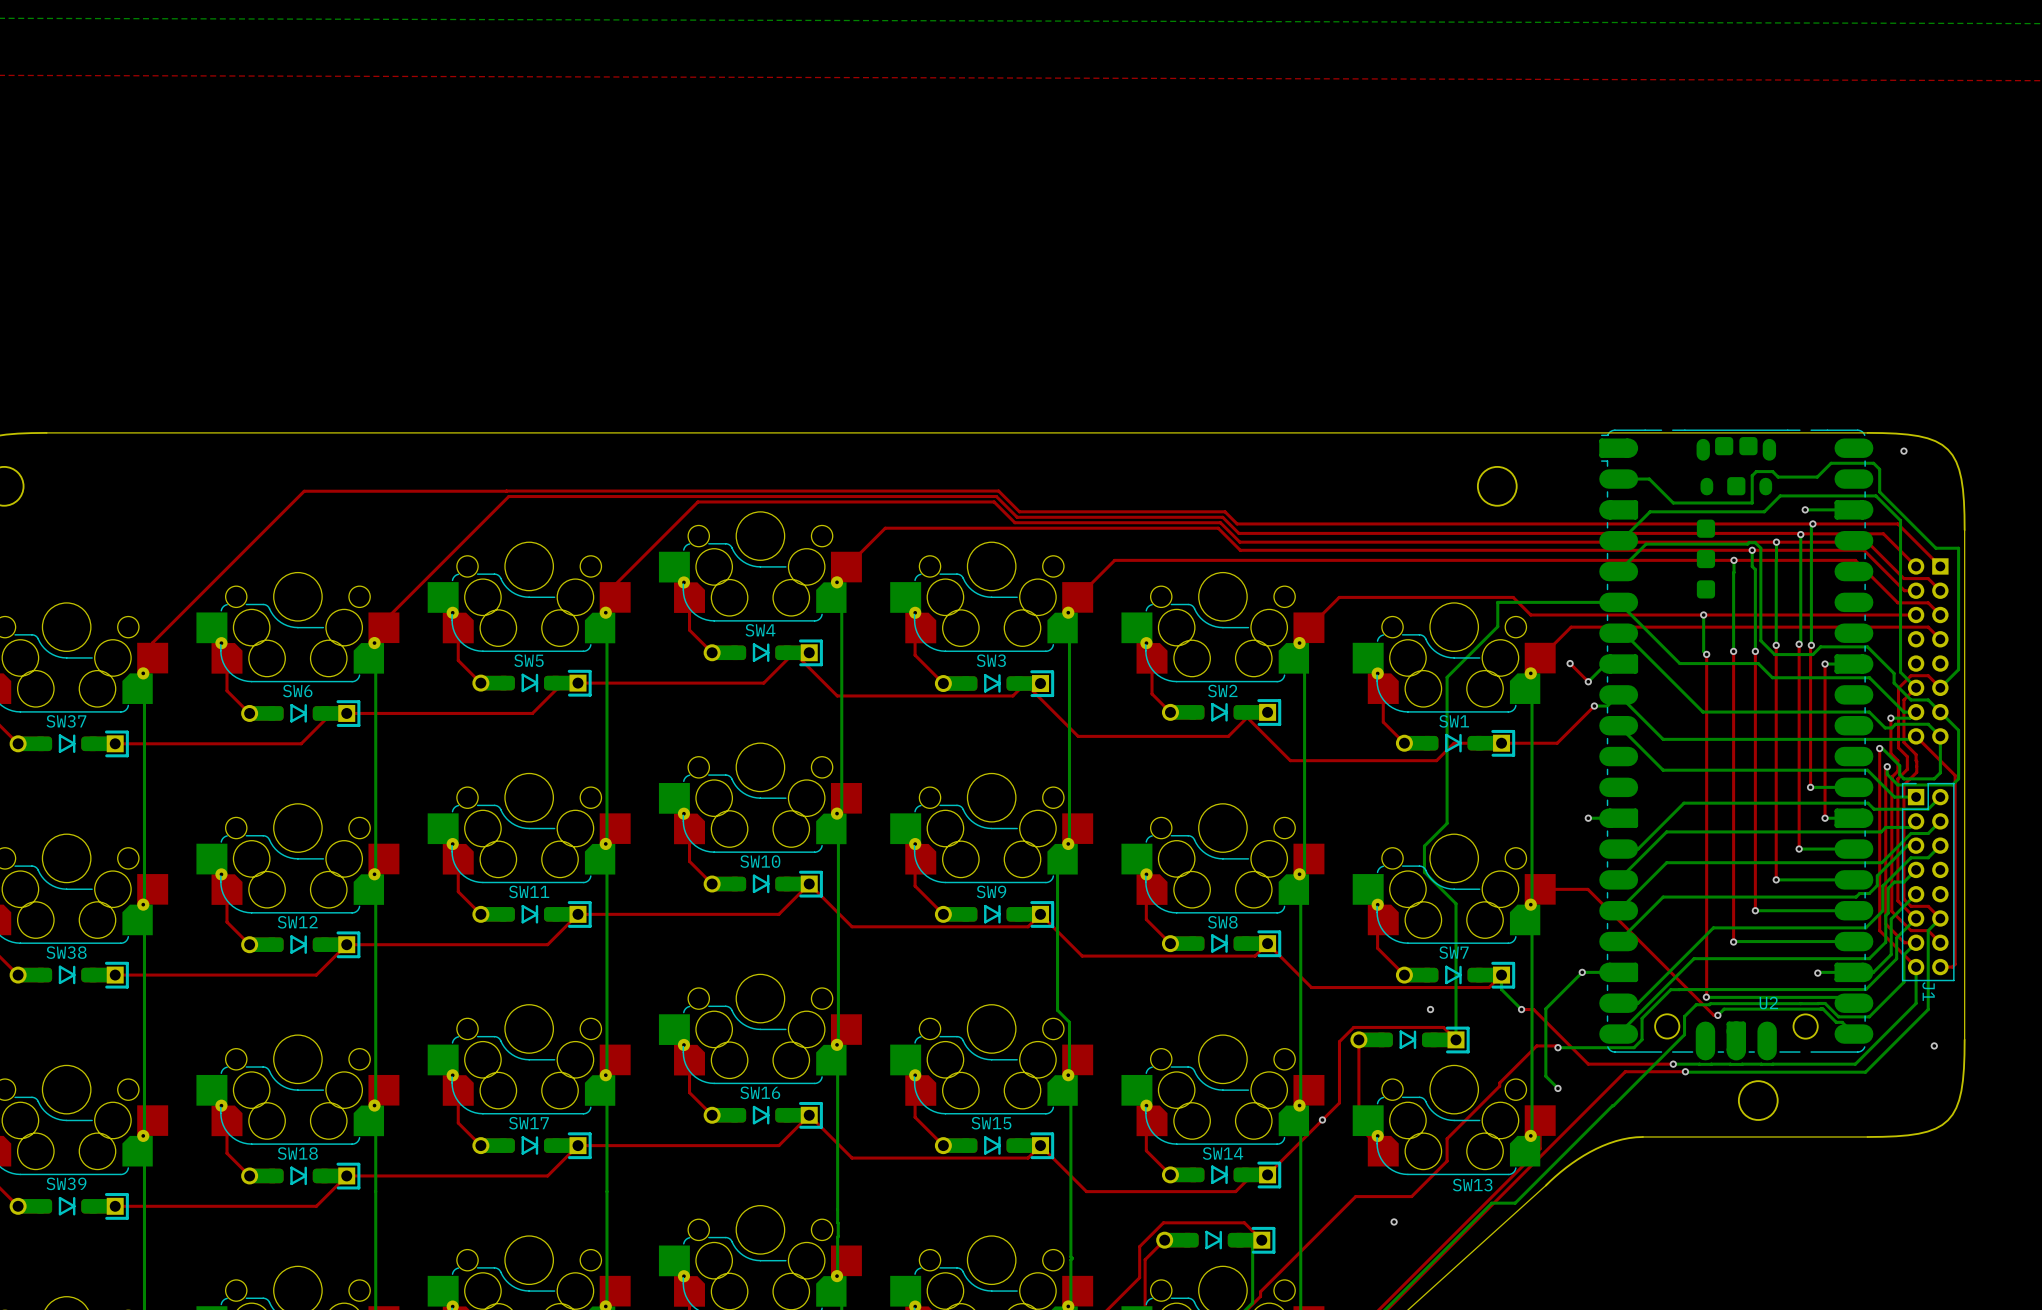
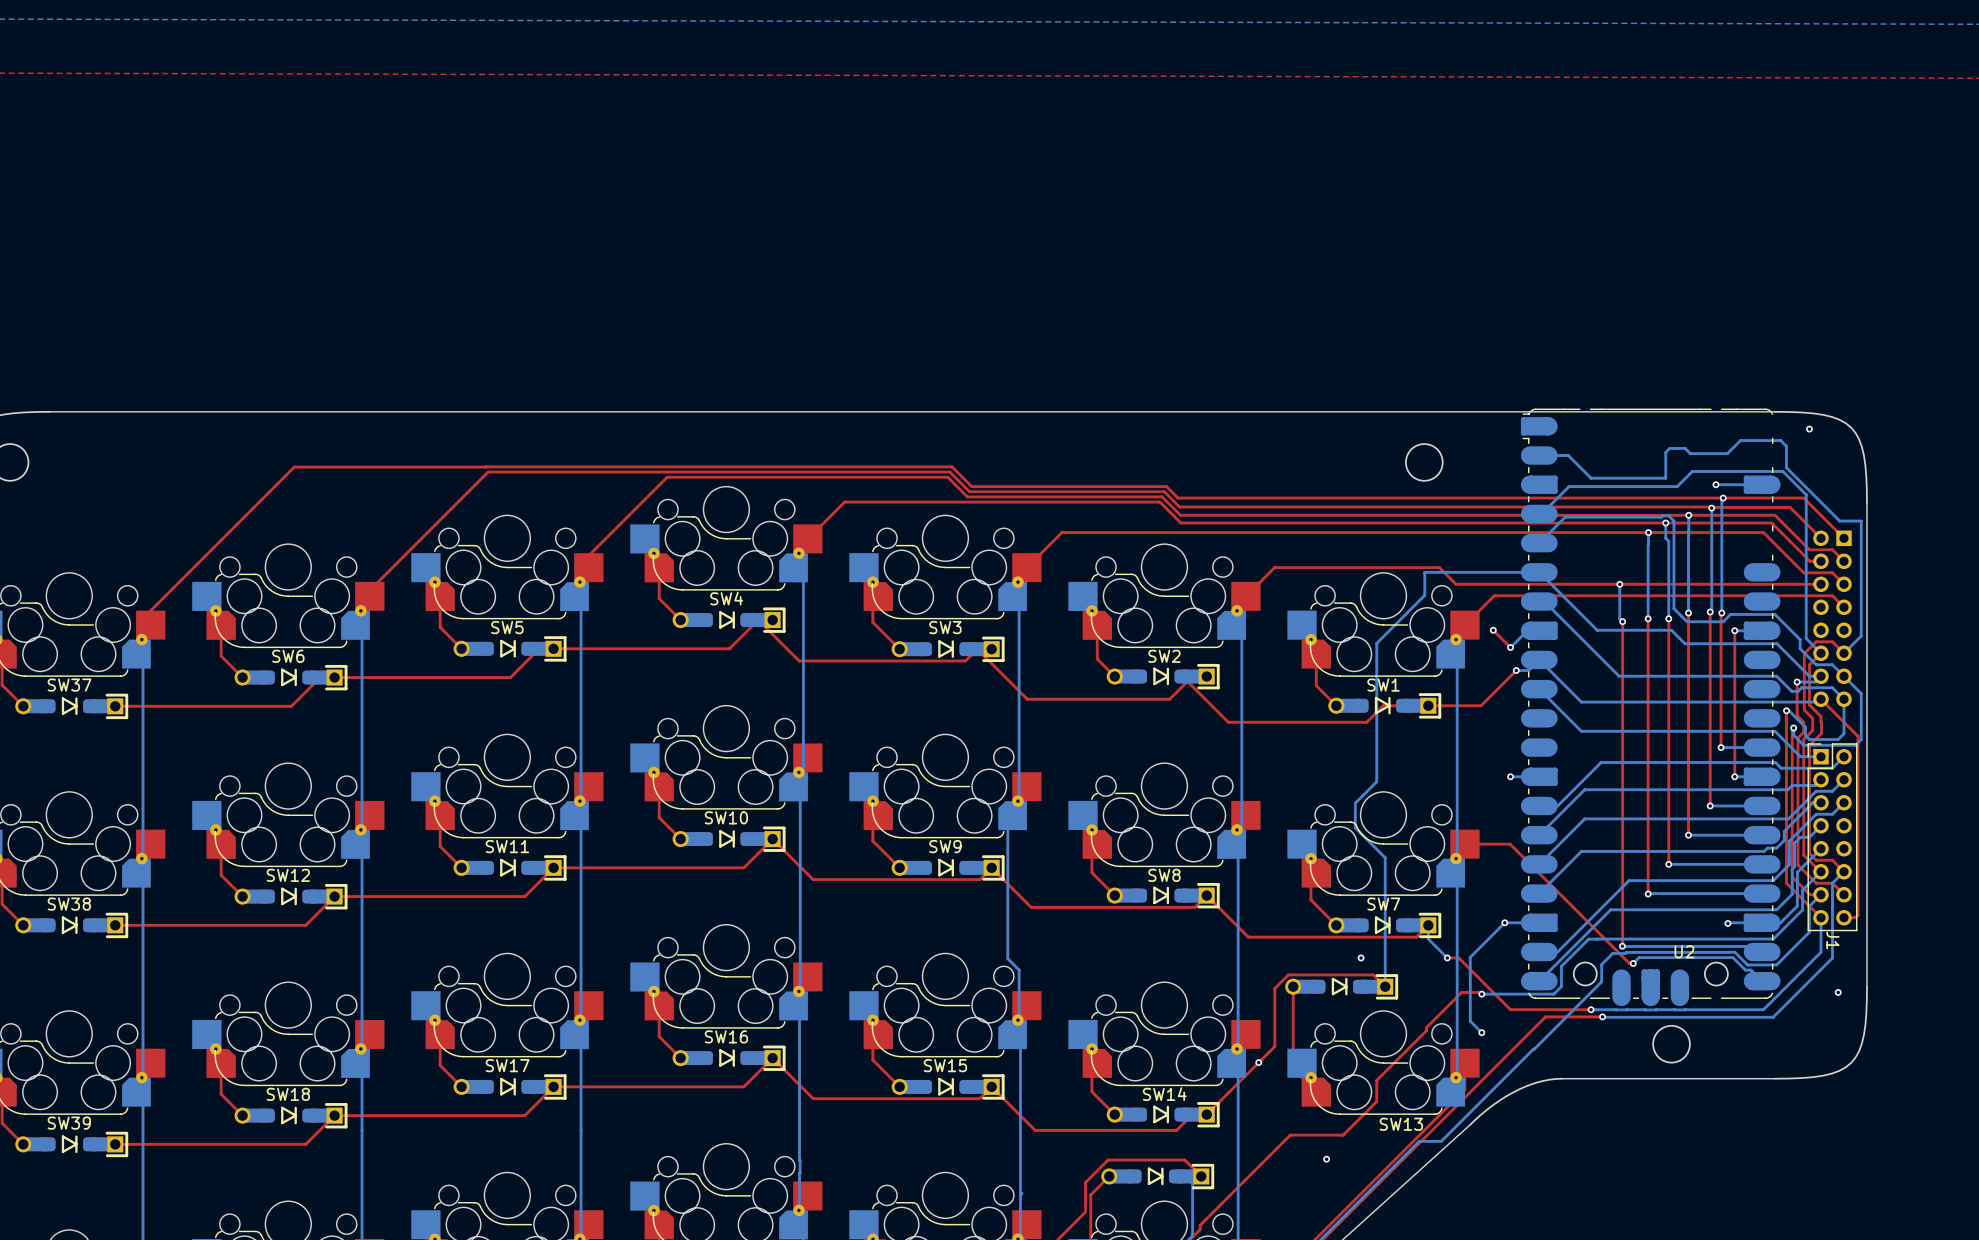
U2 footprint: [1599, 429, 1874, 1061] -> [1520, 408, 1781, 1007]

